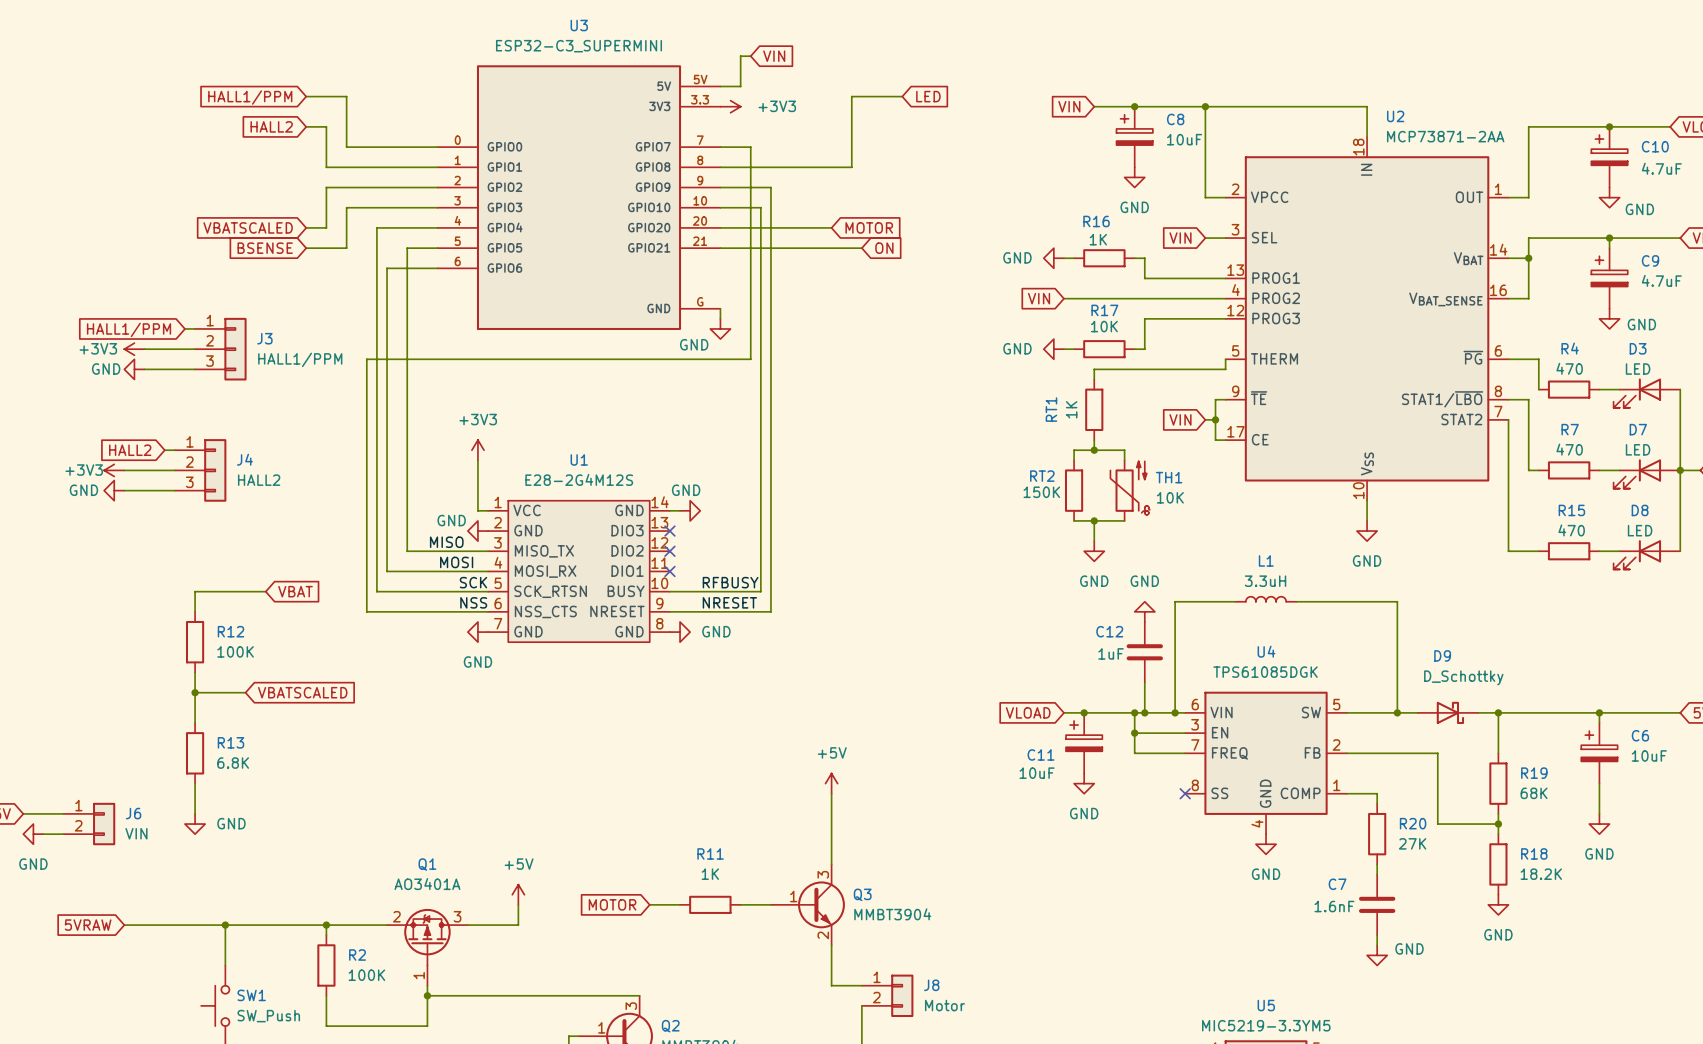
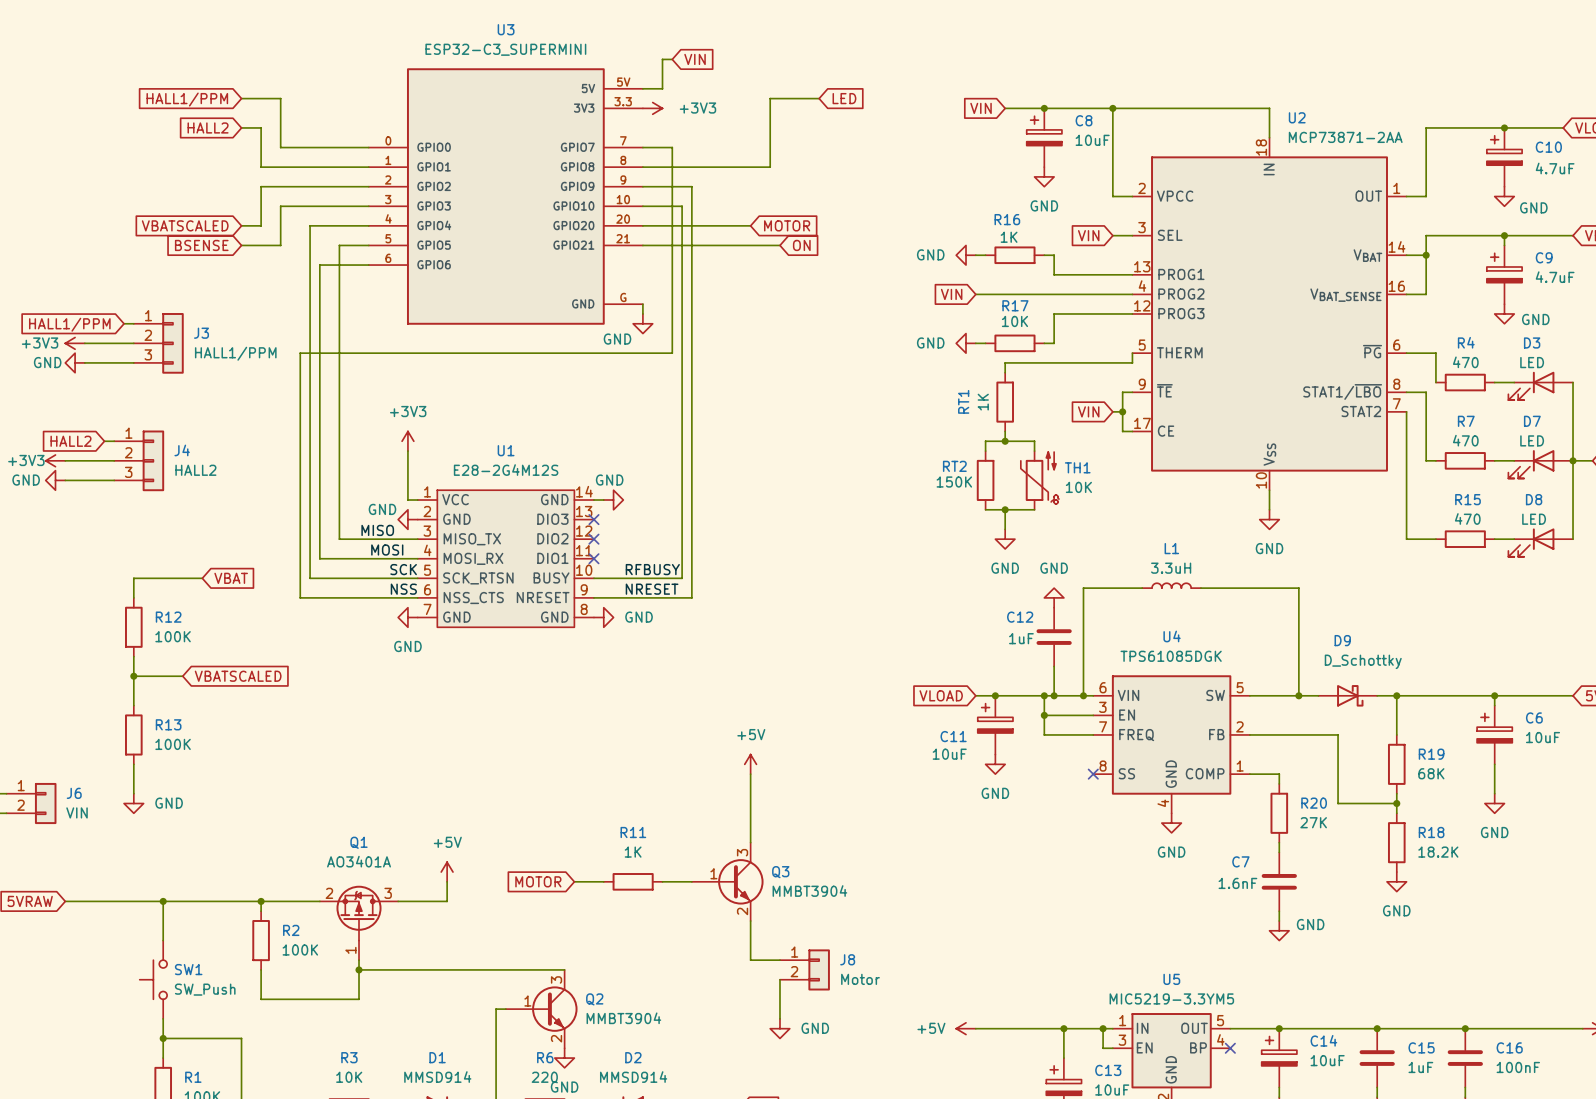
R13 value: 6.8K (233, 763) -> 100K (173, 744)

